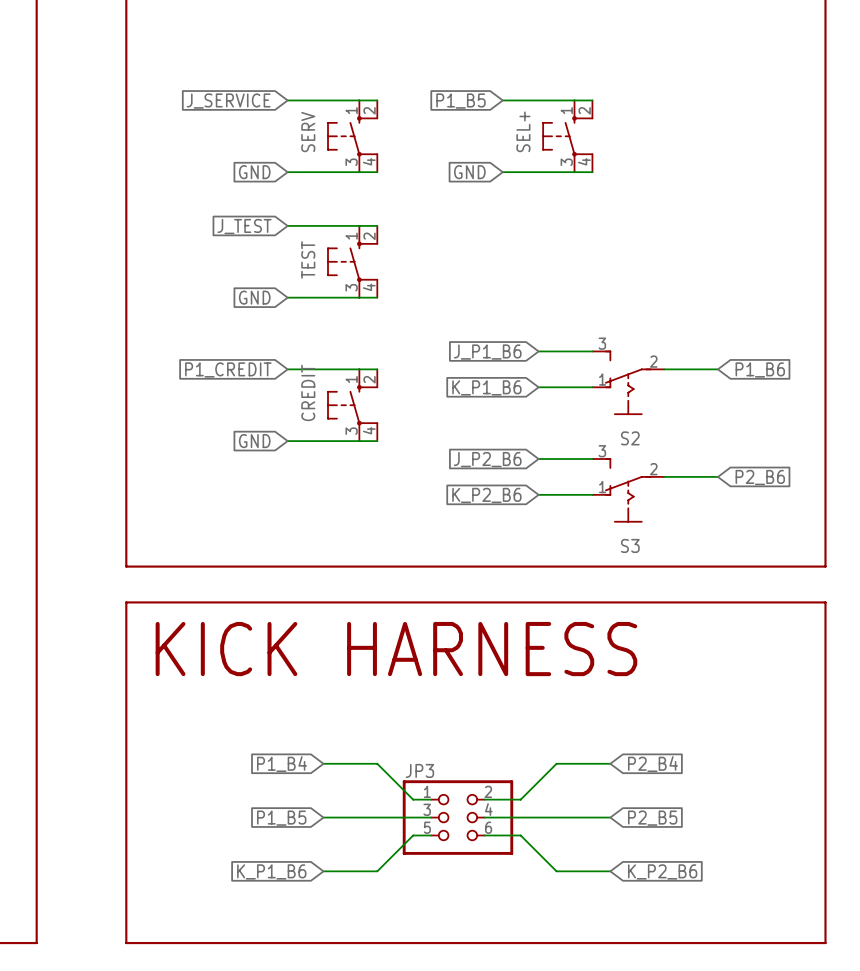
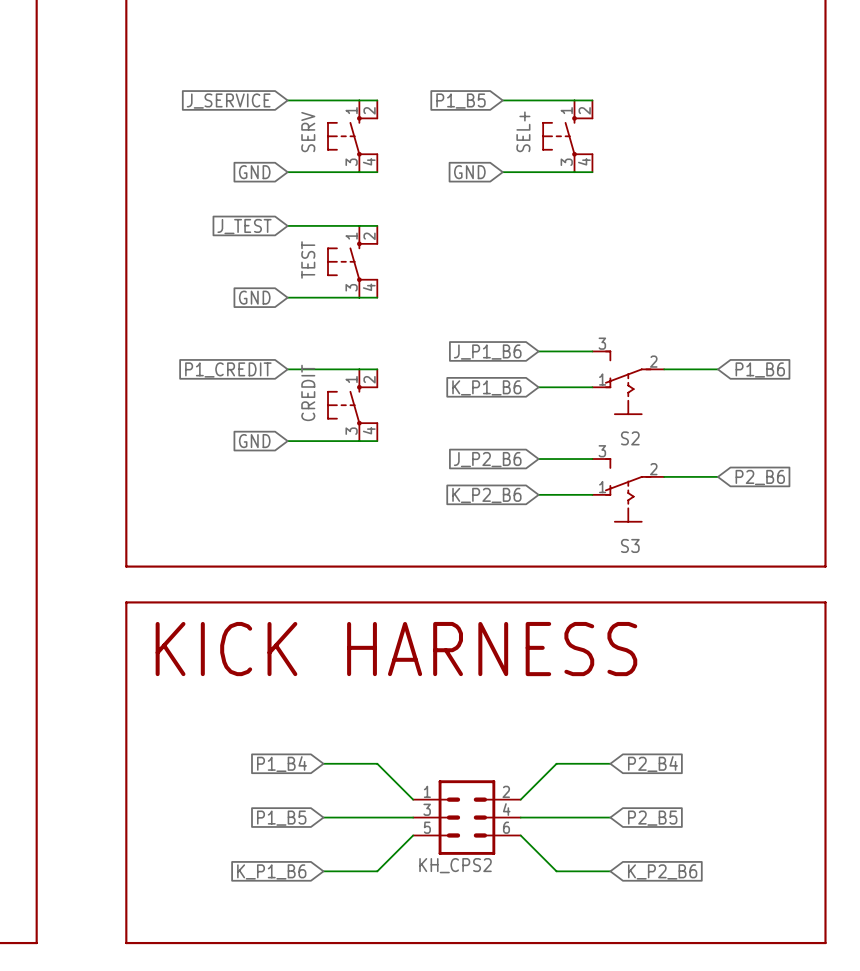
JP3: (457, 817) -> none
KH_CPS2: none -> (466, 817)

